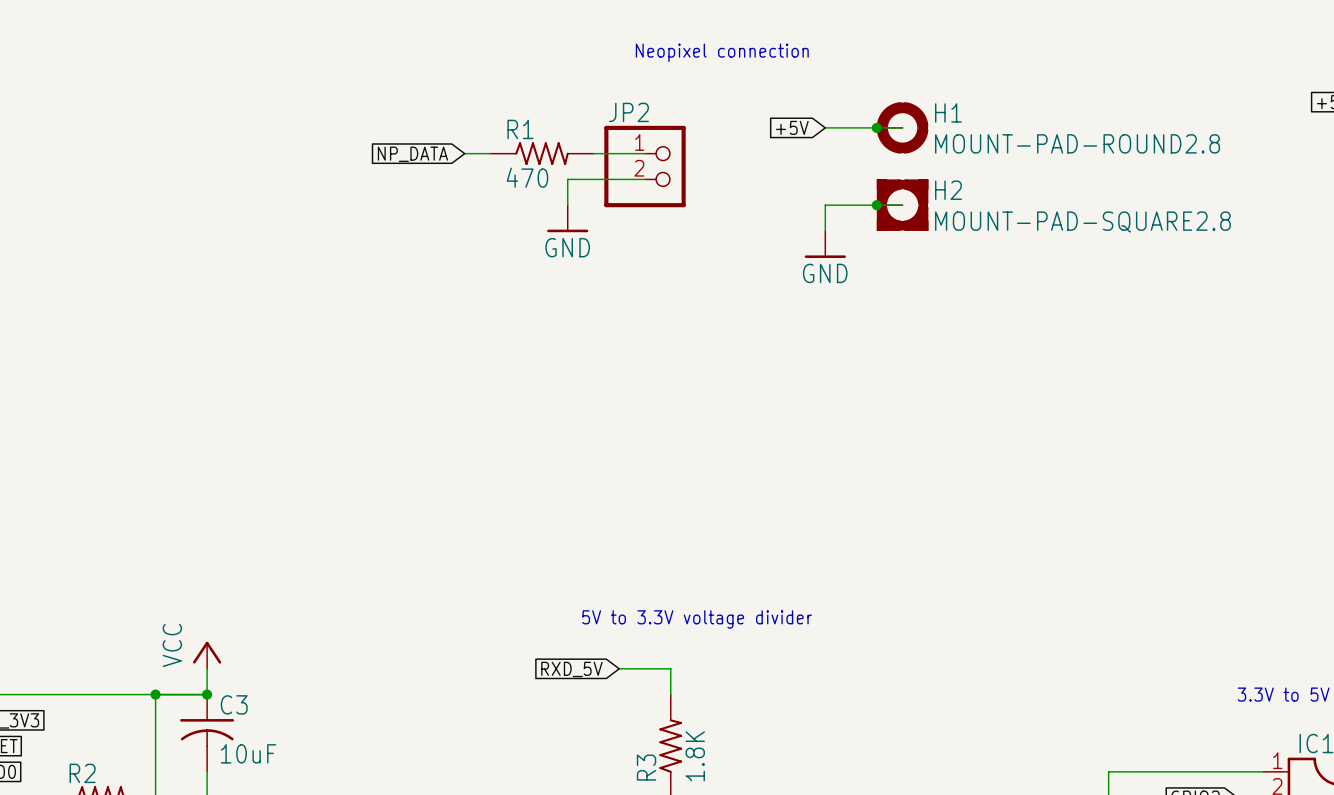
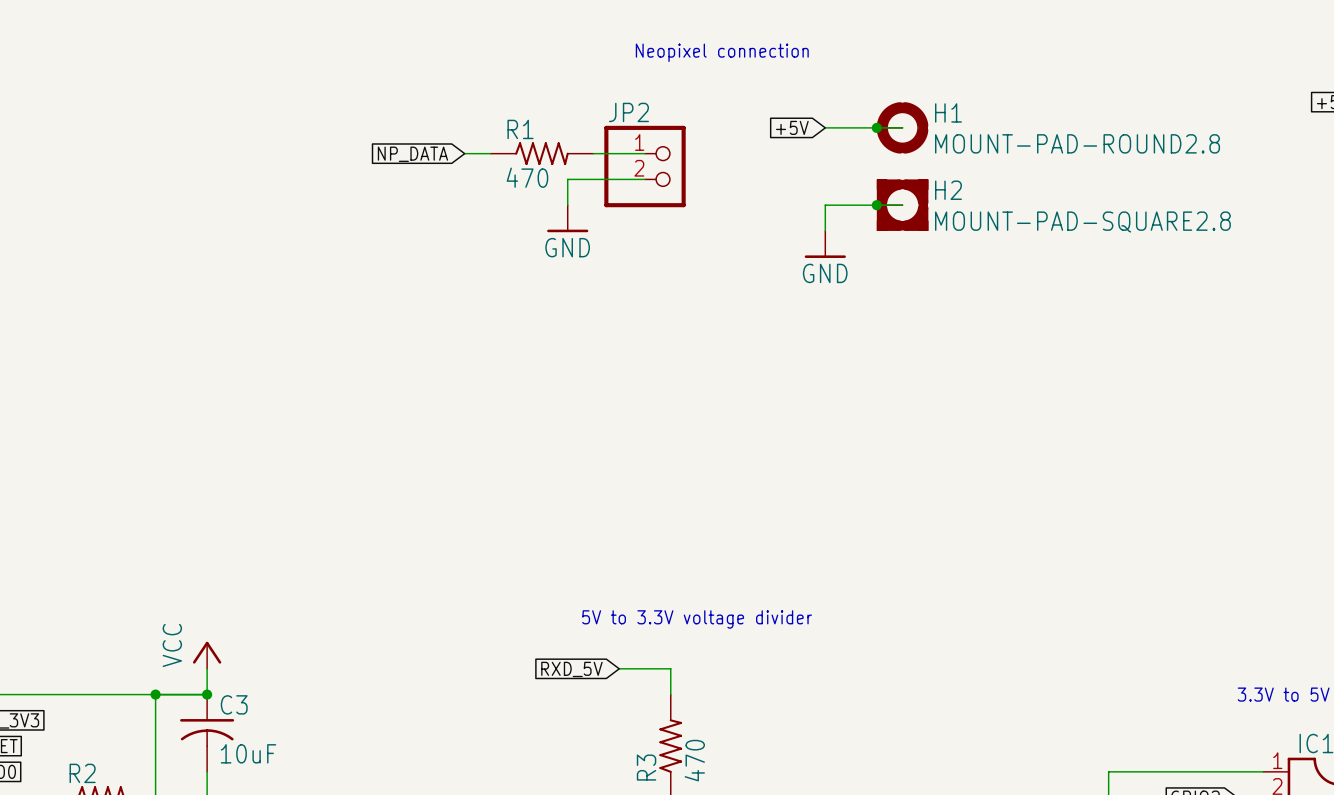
R3 value: 1.8K (695, 756) -> 470 (694, 760)

